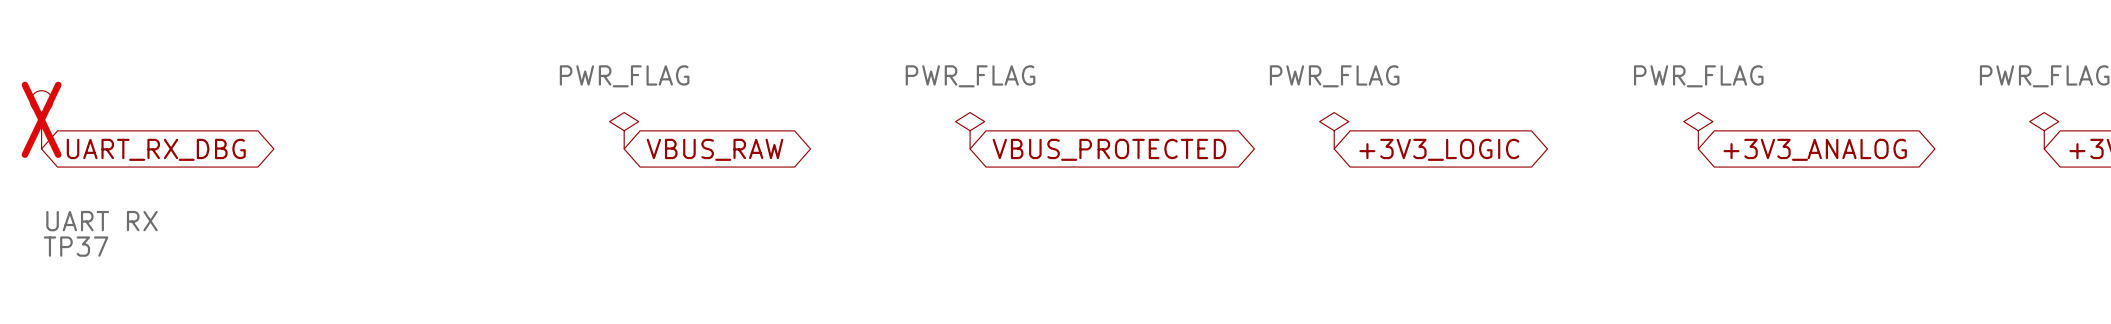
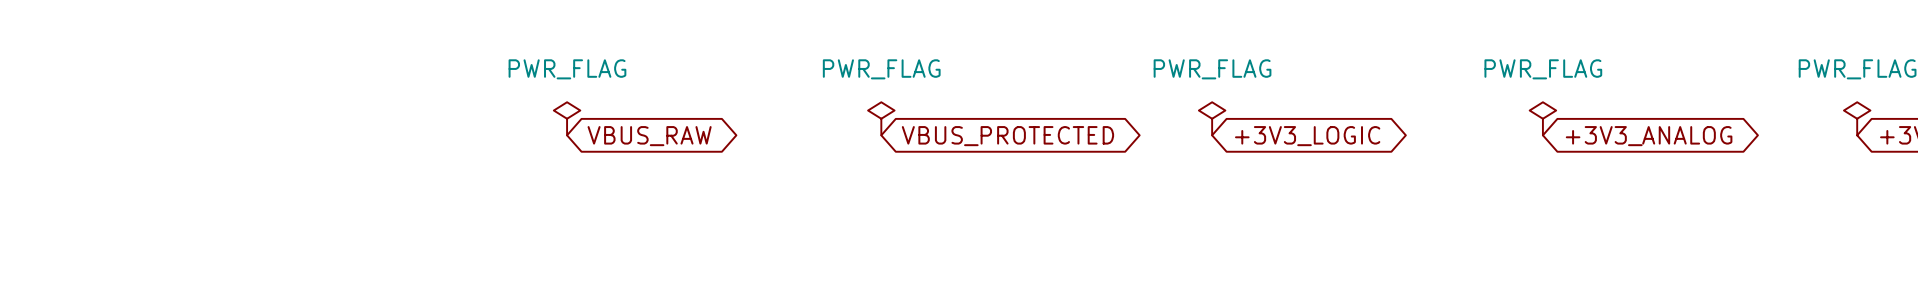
TP37: UART RX (41, 119) -> none
global label: UART_RX_DBG (156, 149) -> none

